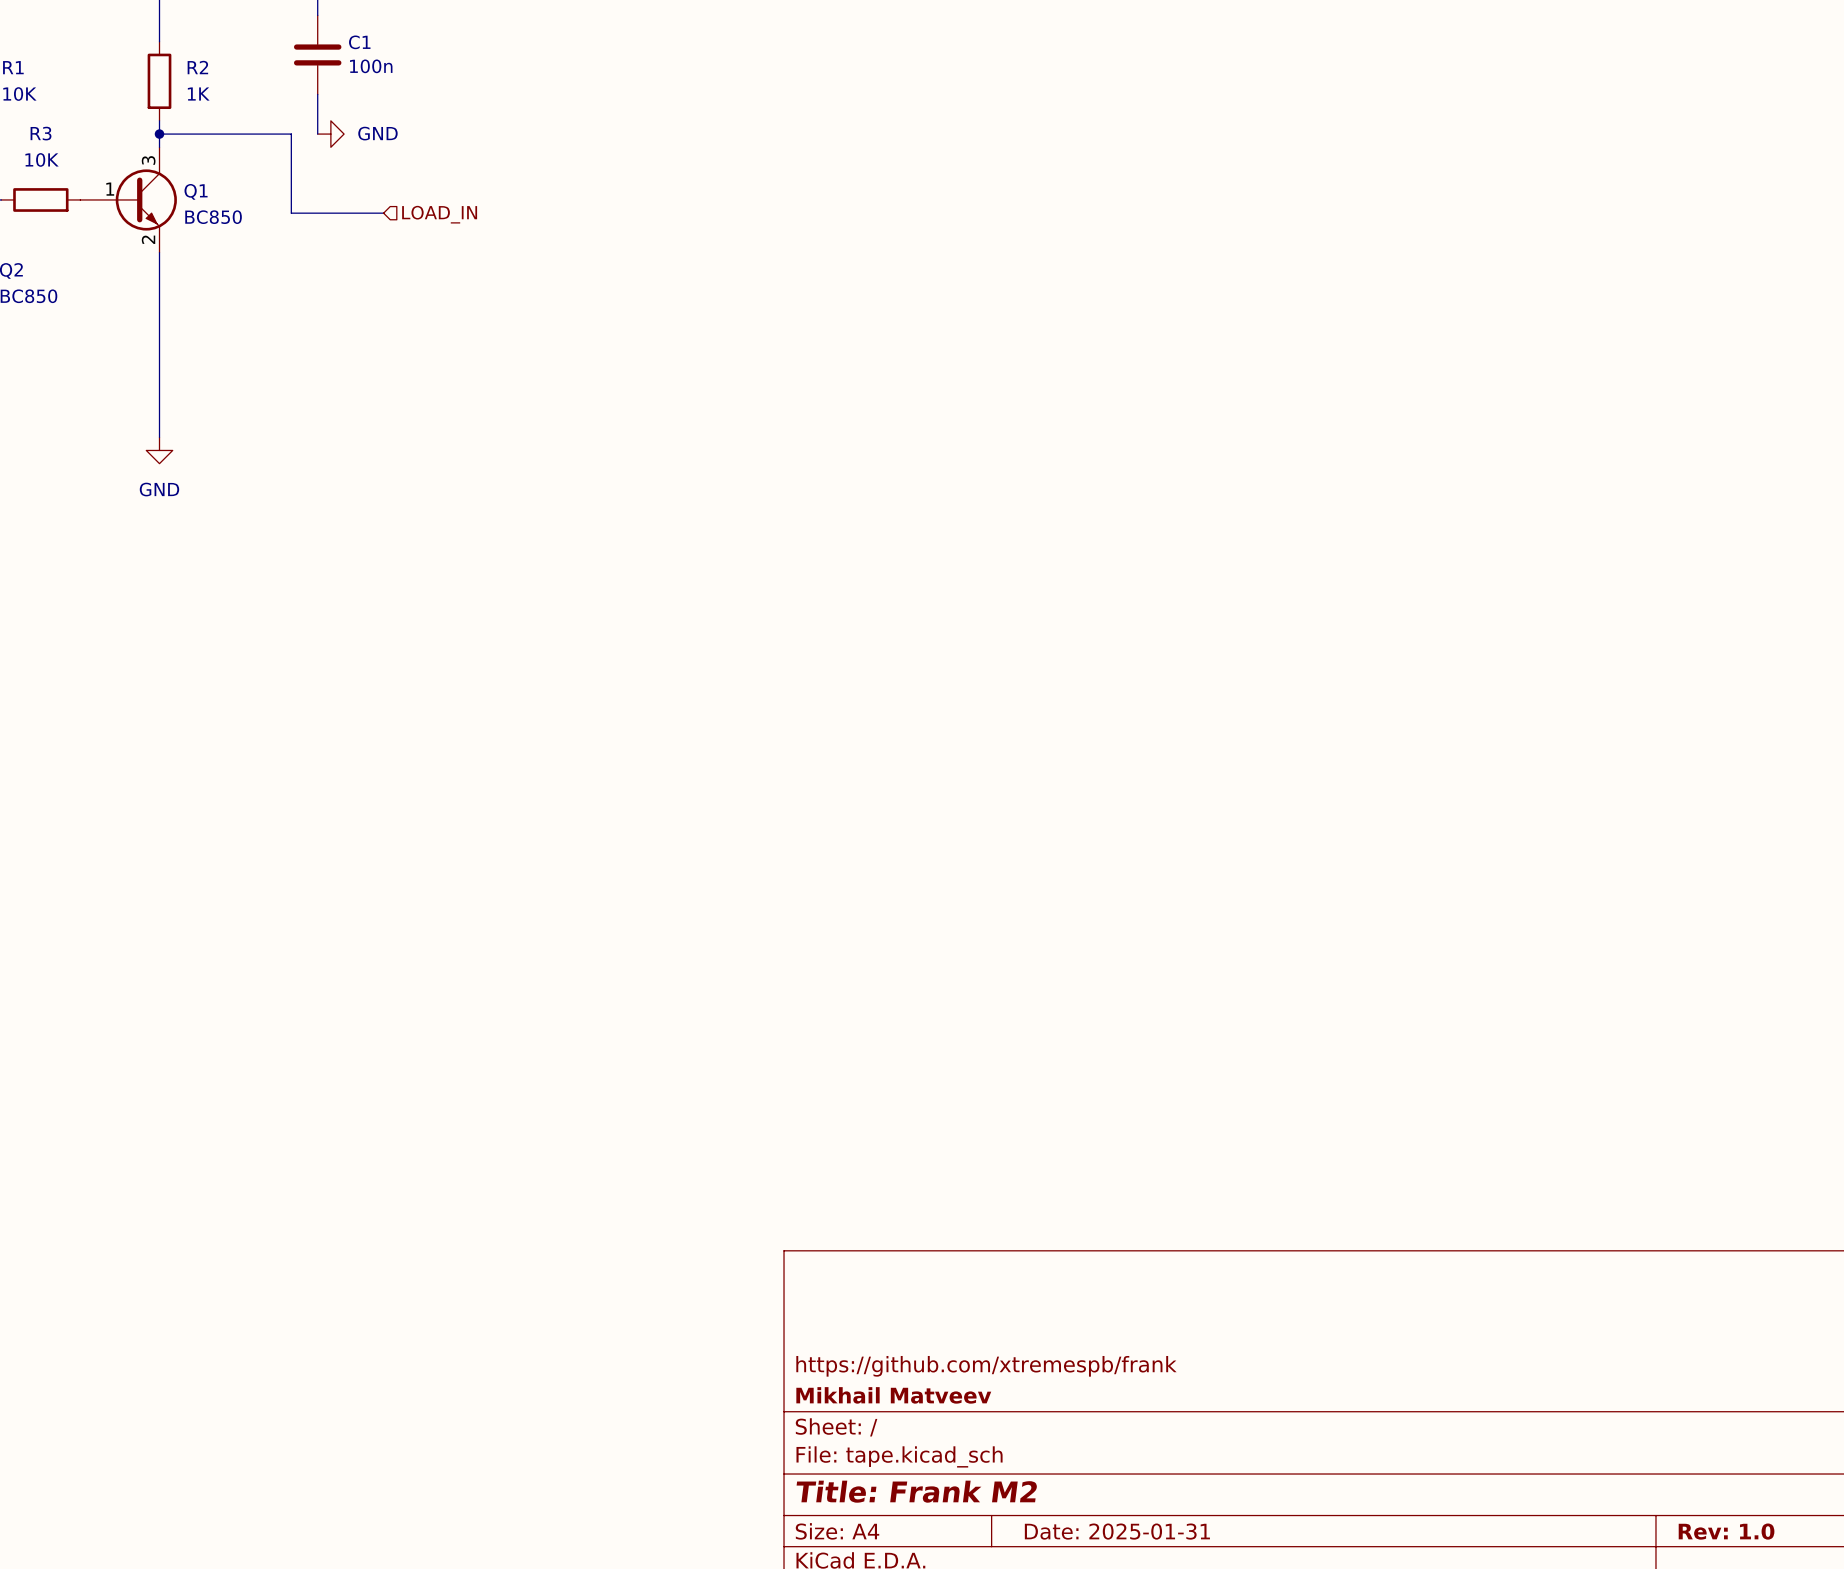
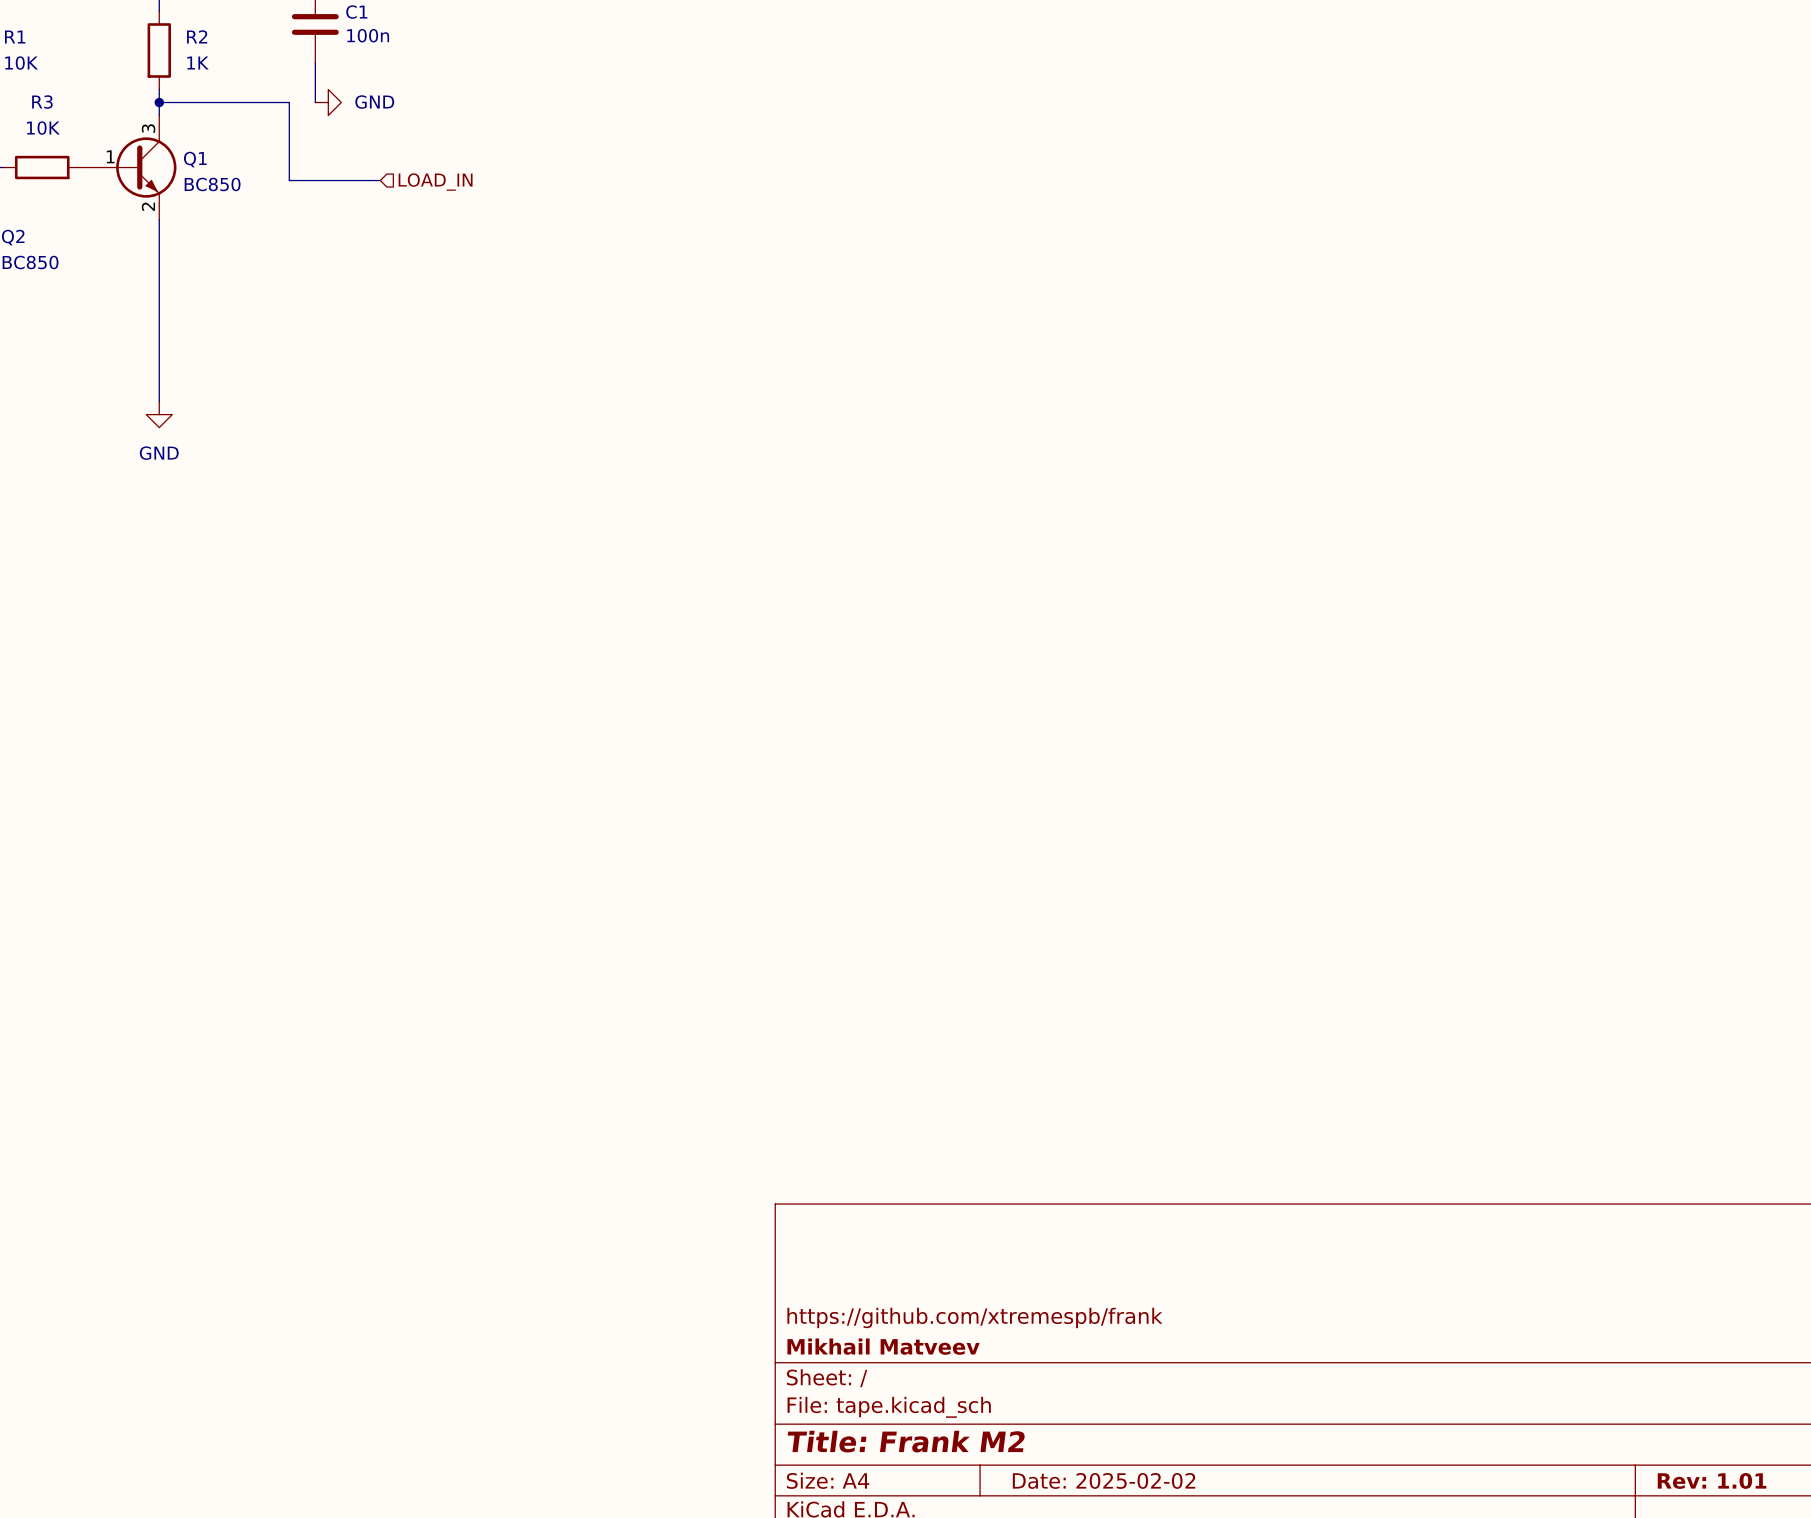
title block: Date: 2025-01-31 (1117, 1531) -> Date: 2025-02-02 (1104, 1480)
title block: Rev: 1.0 (1726, 1531) -> Rev: 1.01 (1712, 1480)

